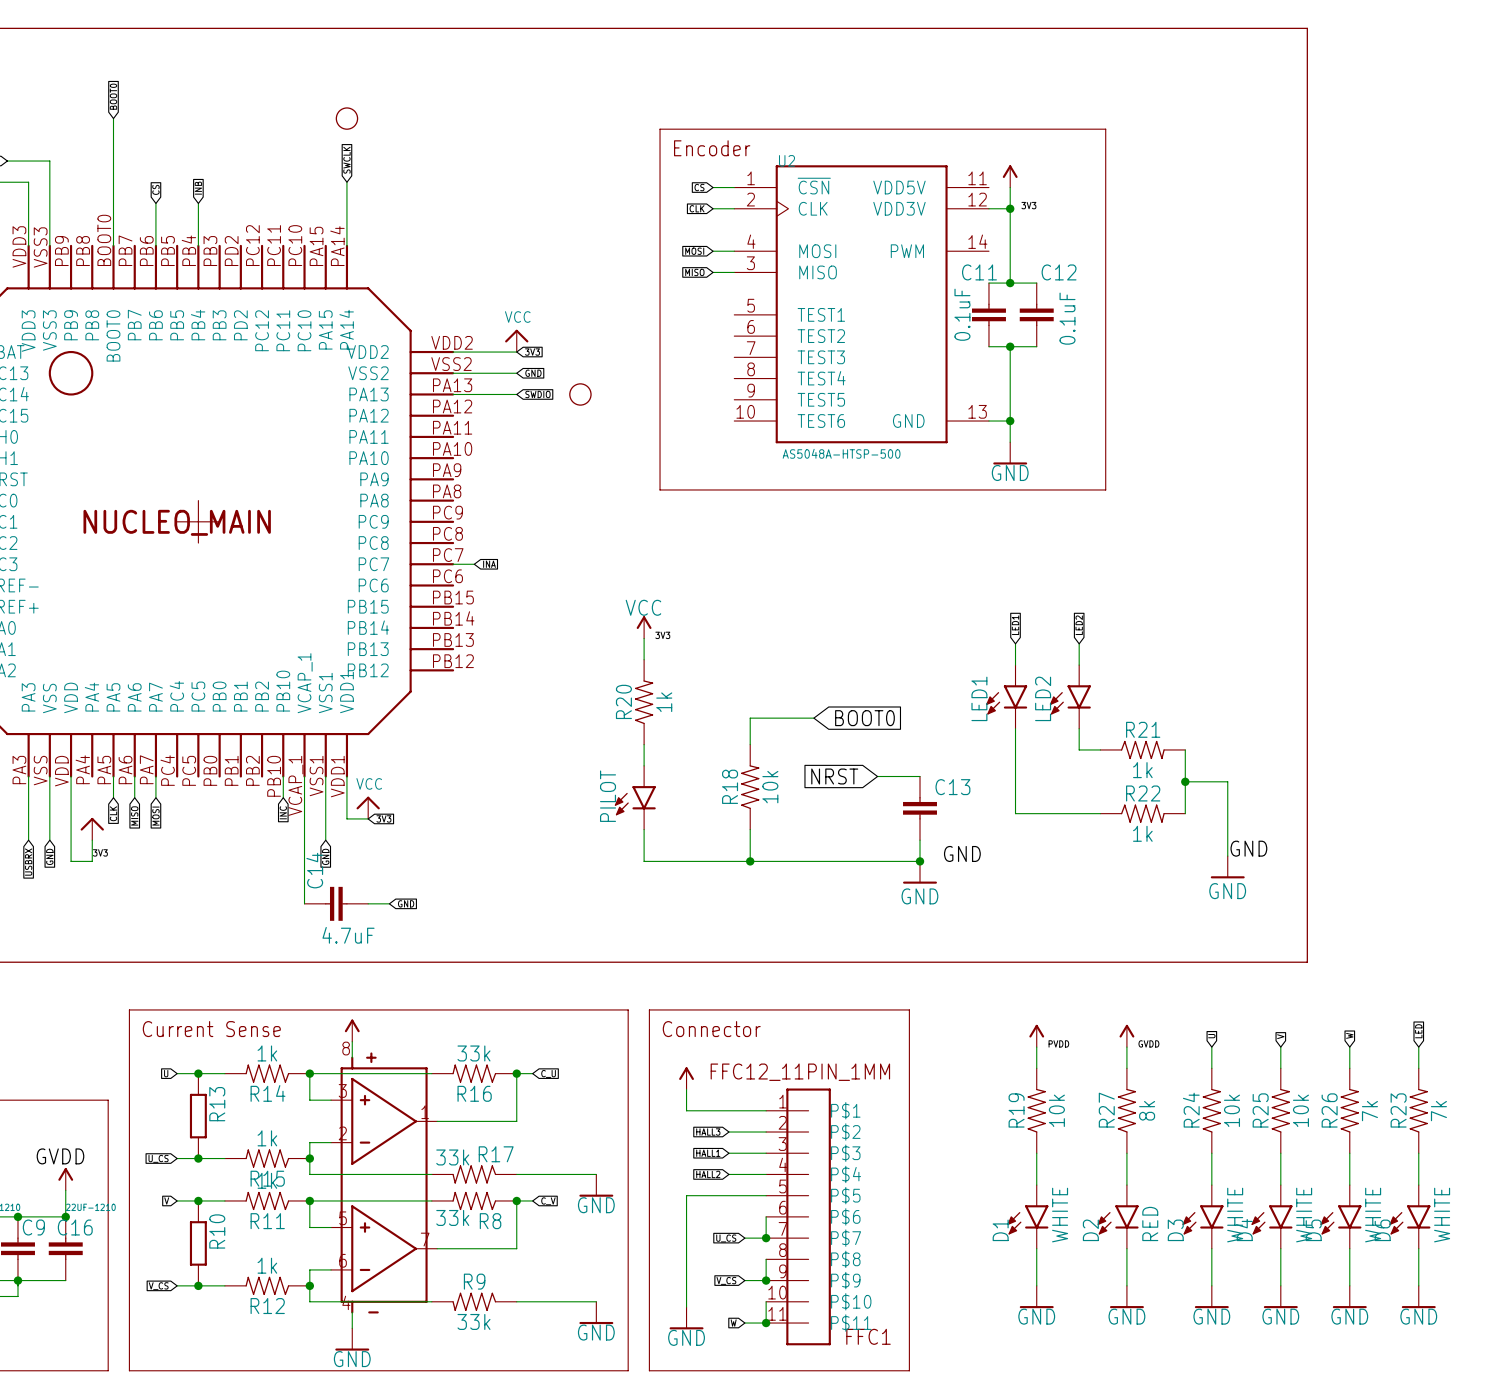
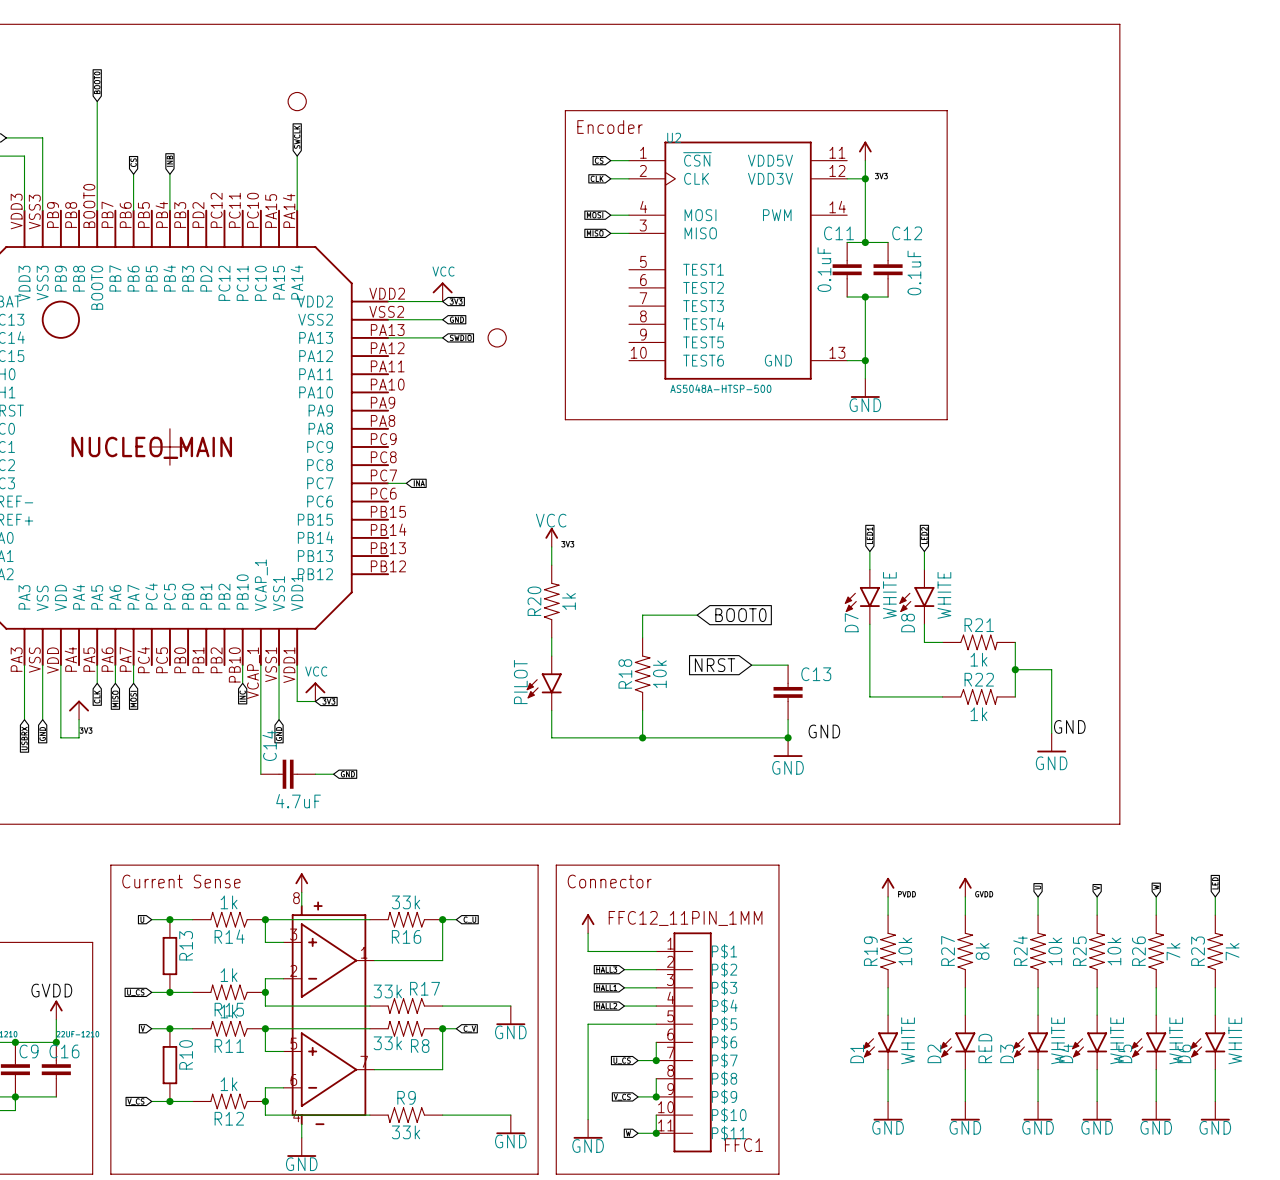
LED1 value: none -> WHITE (889, 595)
LED2 value: none -> WHITE (944, 595)
LED1 name: LED1 (979, 698) -> D7 (851, 622)
LED2 name: LED2 (1043, 698) -> D8 (908, 623)

